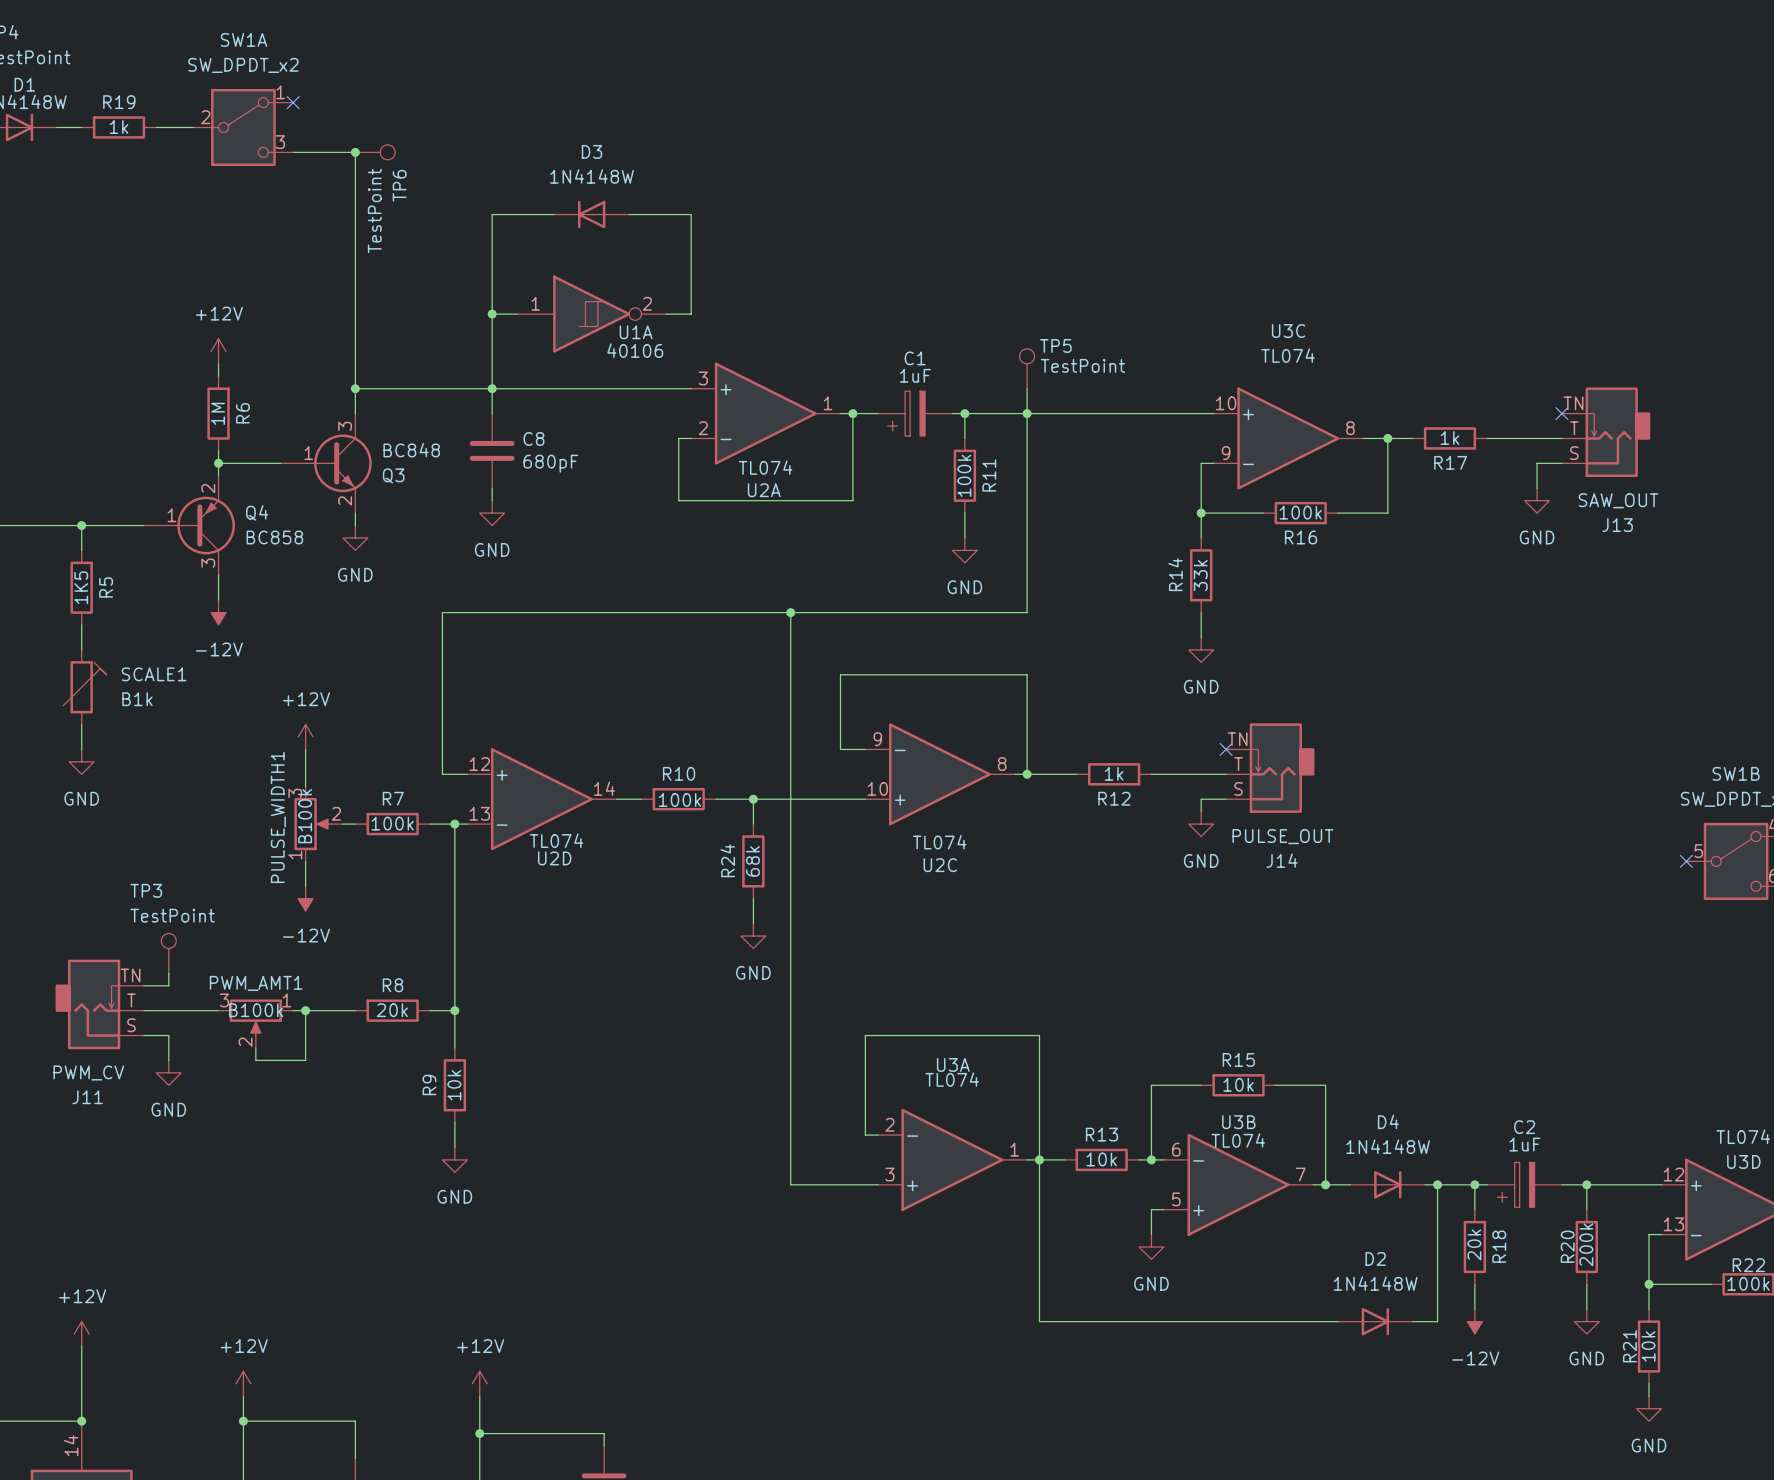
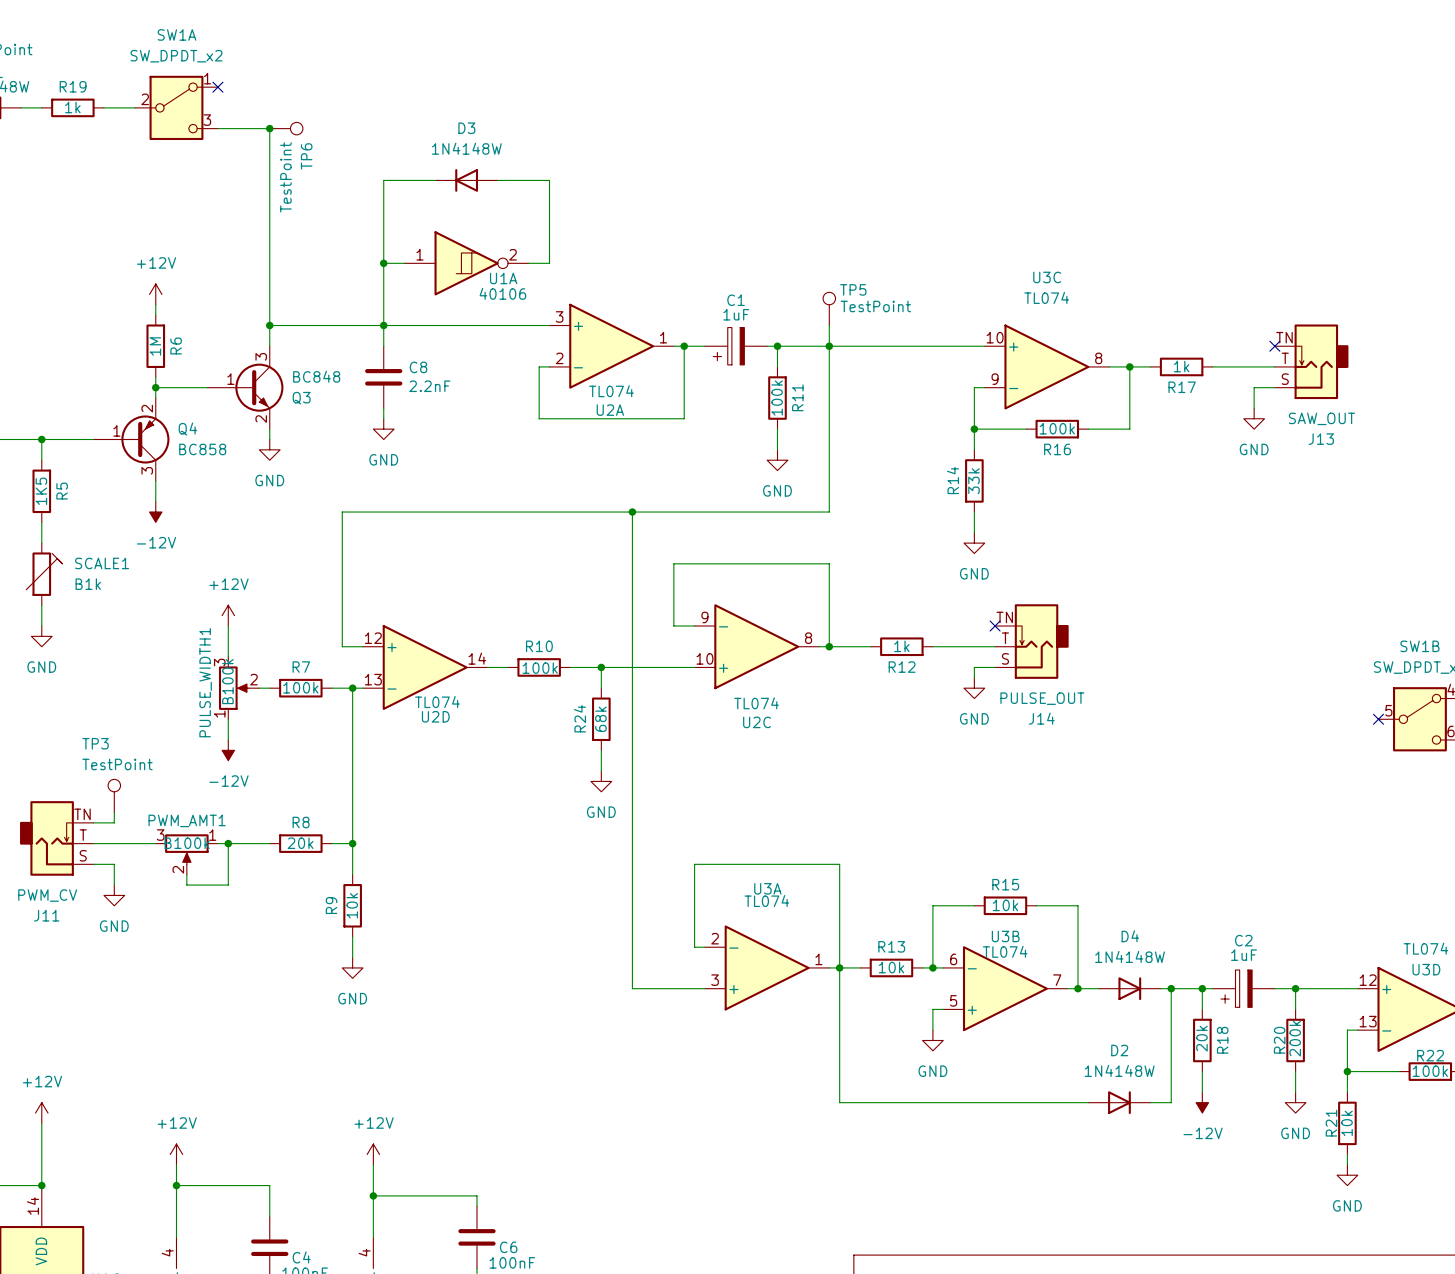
C8 value: 680pF (550, 463) -> 2.2nF (429, 386)

